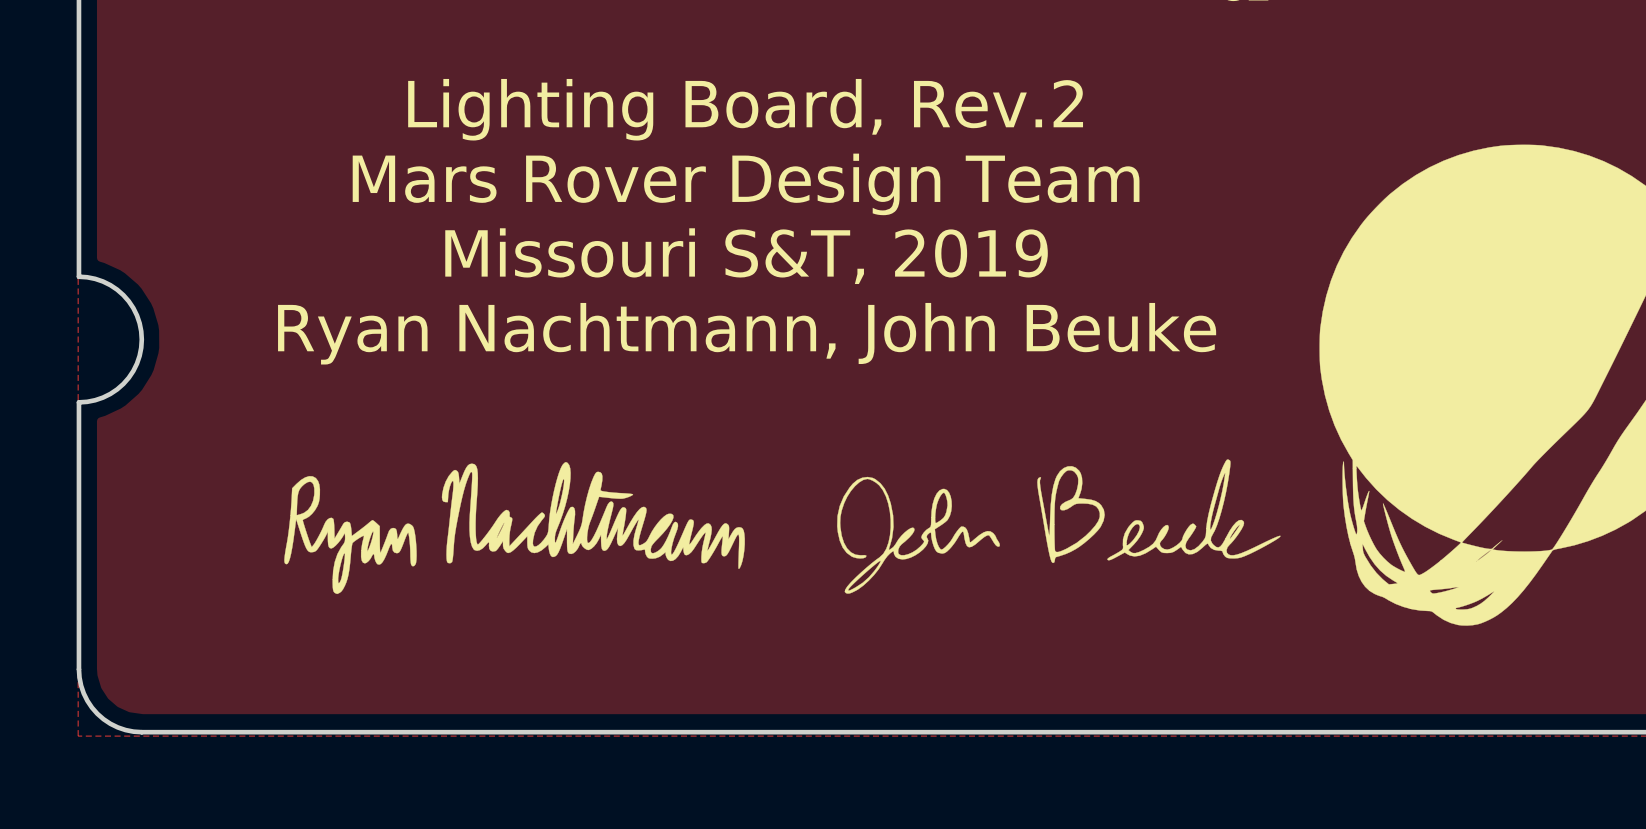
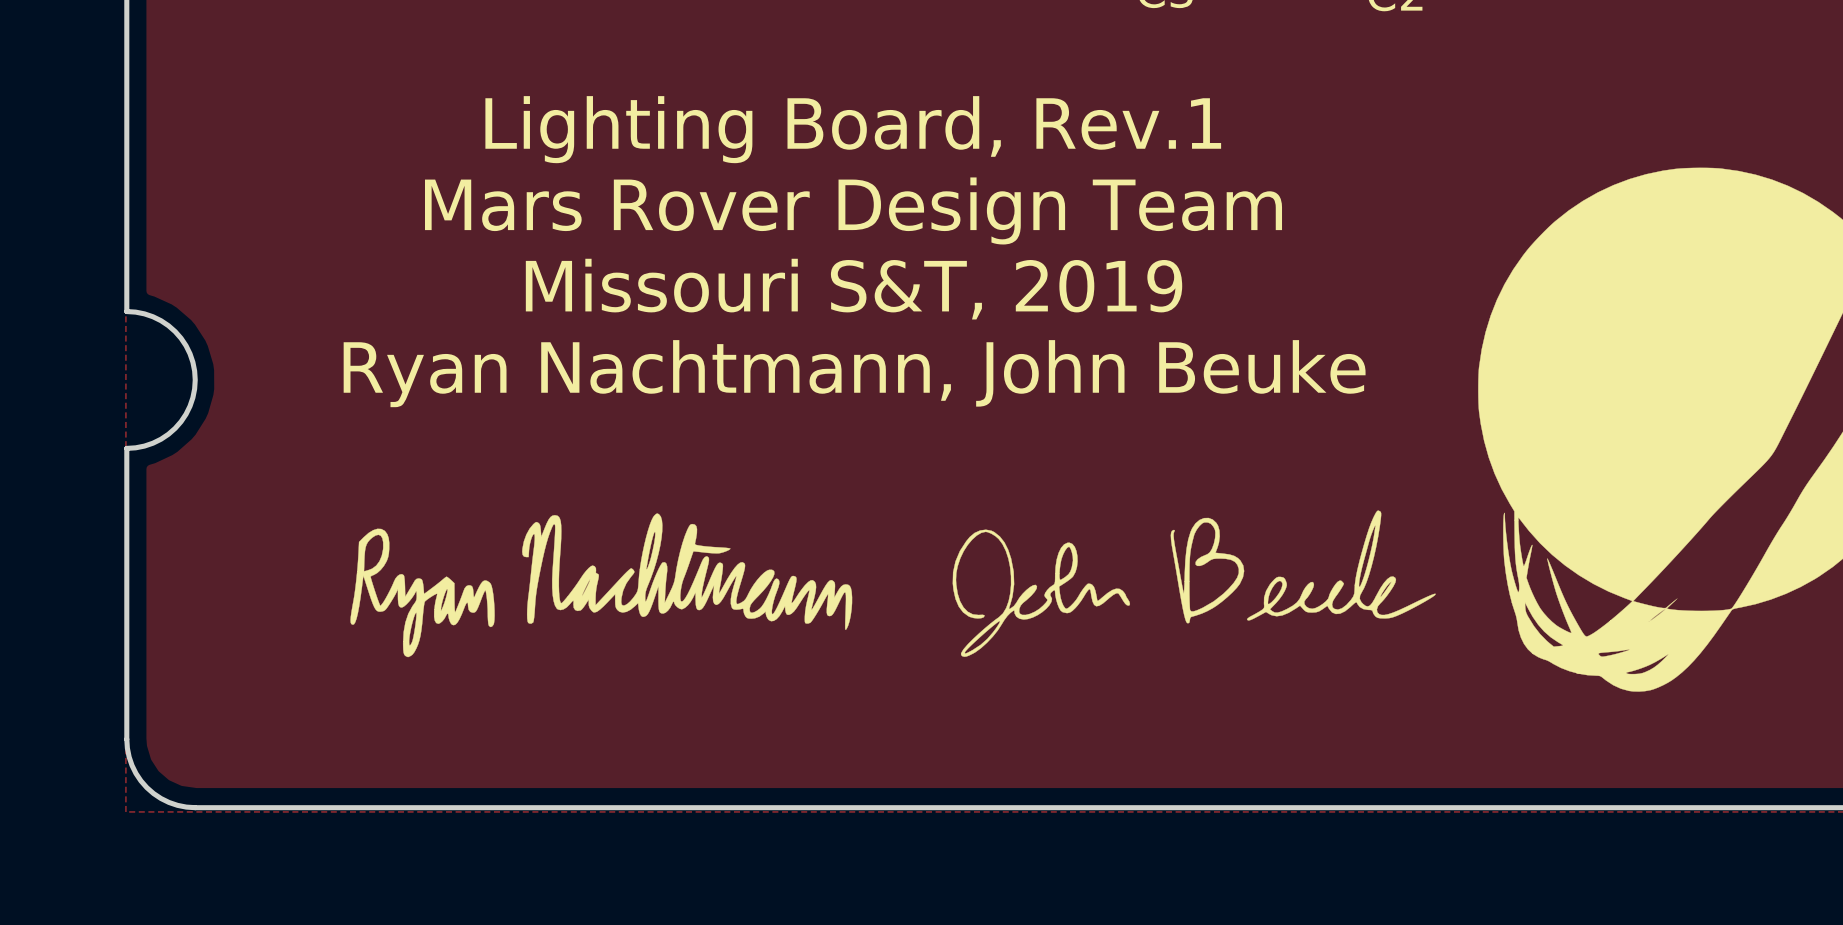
text: Lighting Board, Rev.2 (745, 109) -> Lighting Board, Rev.1 (853, 129)

